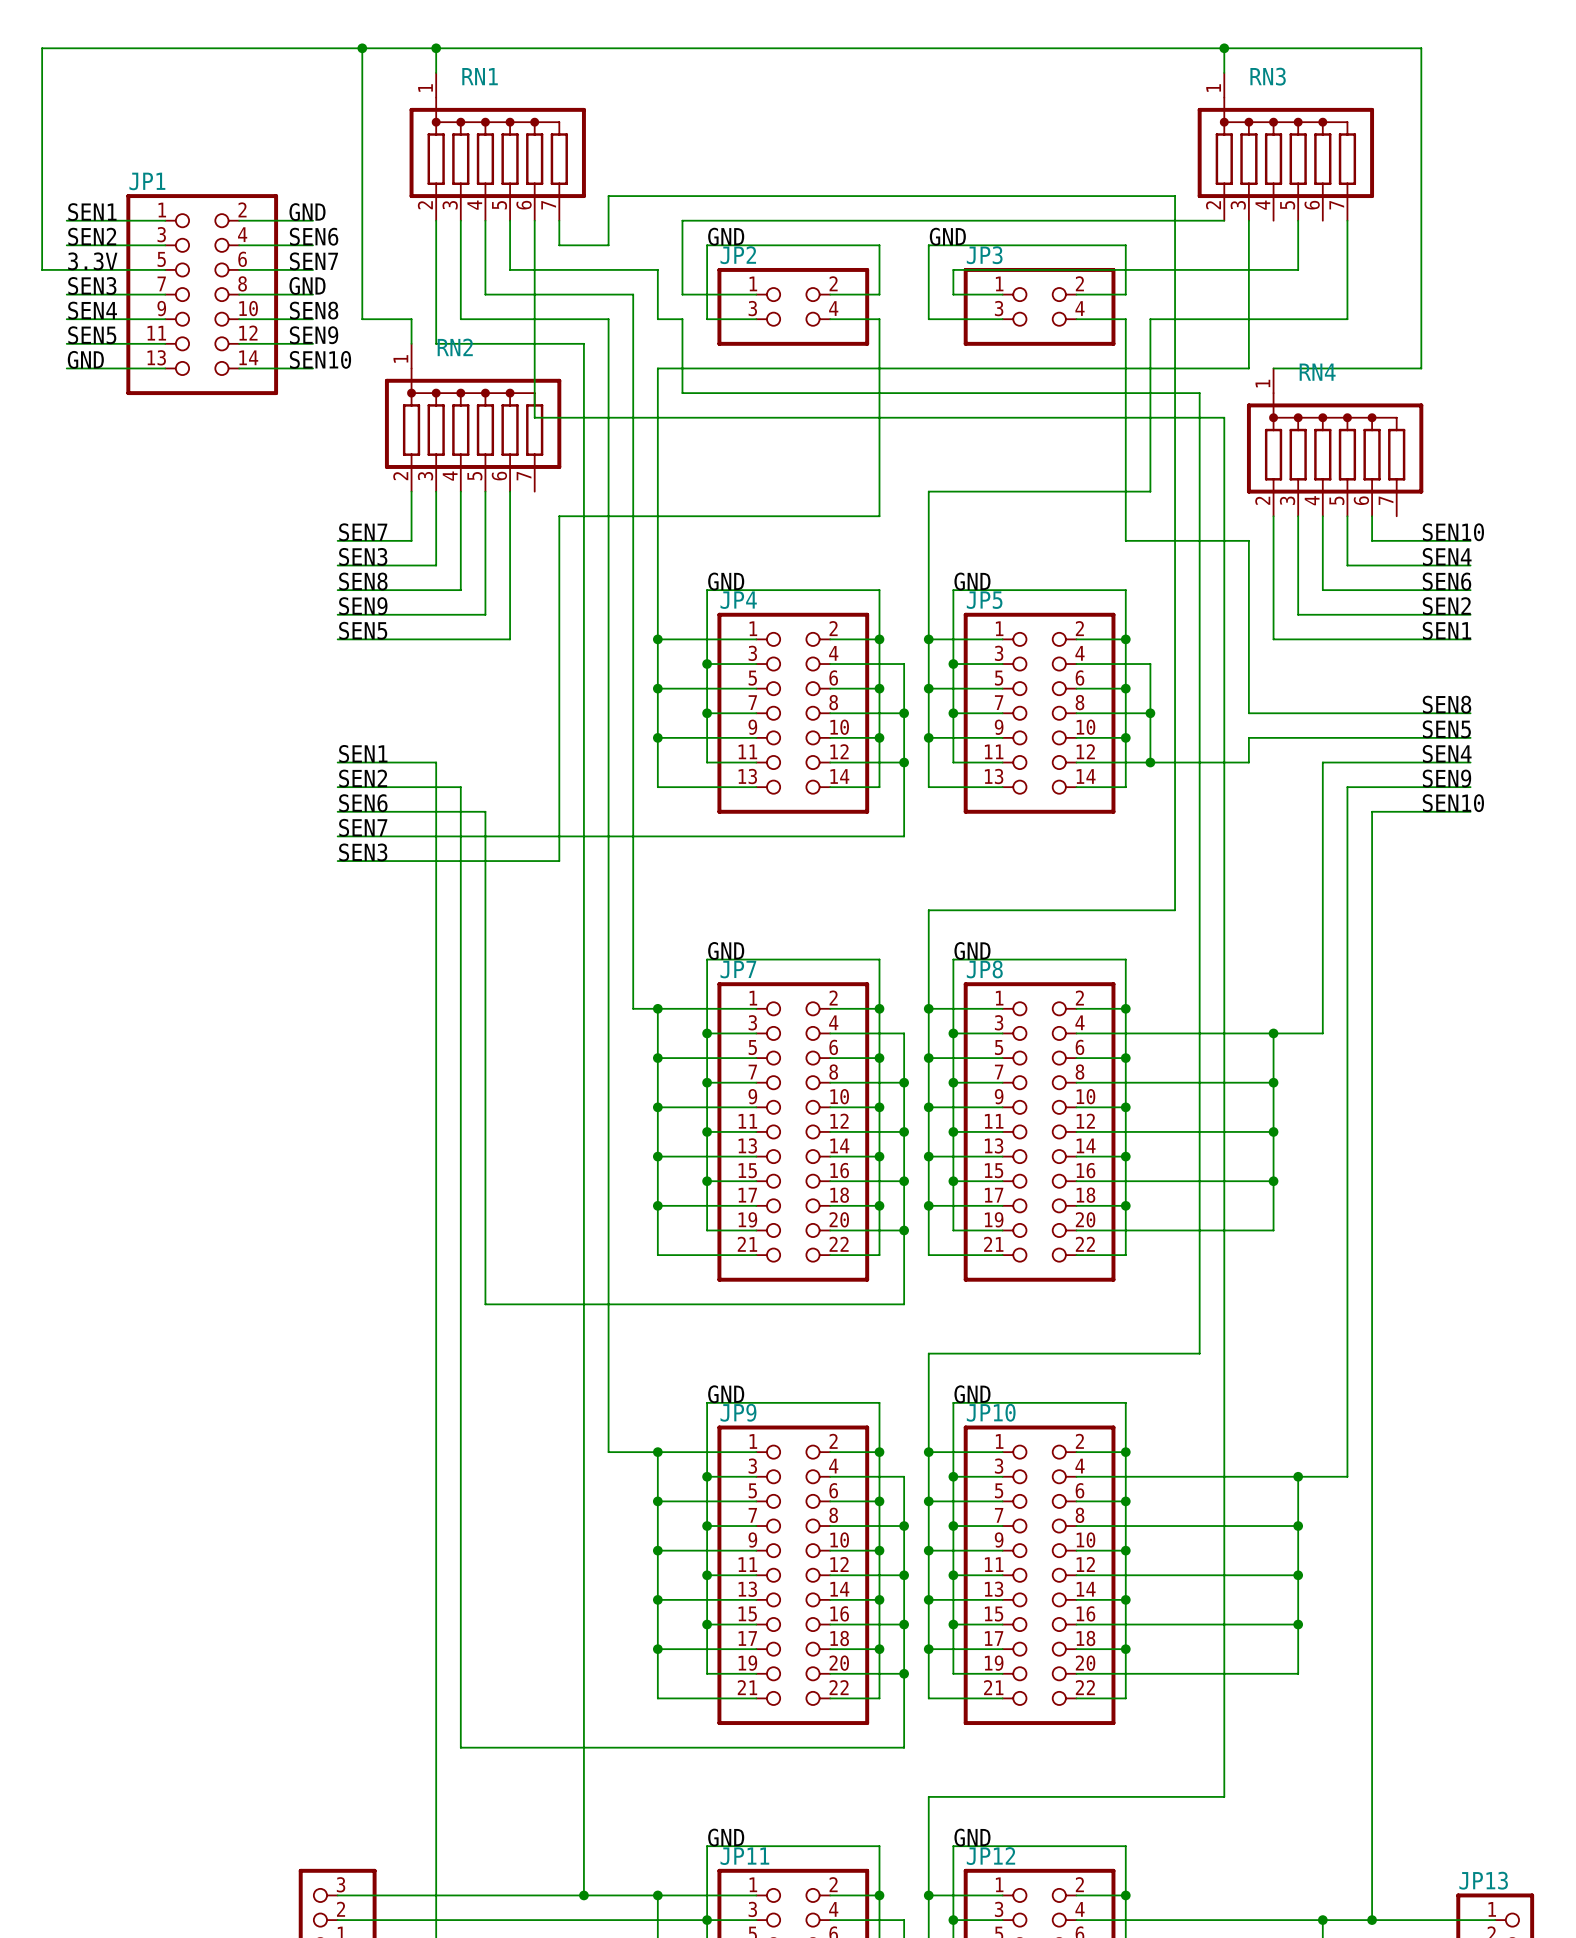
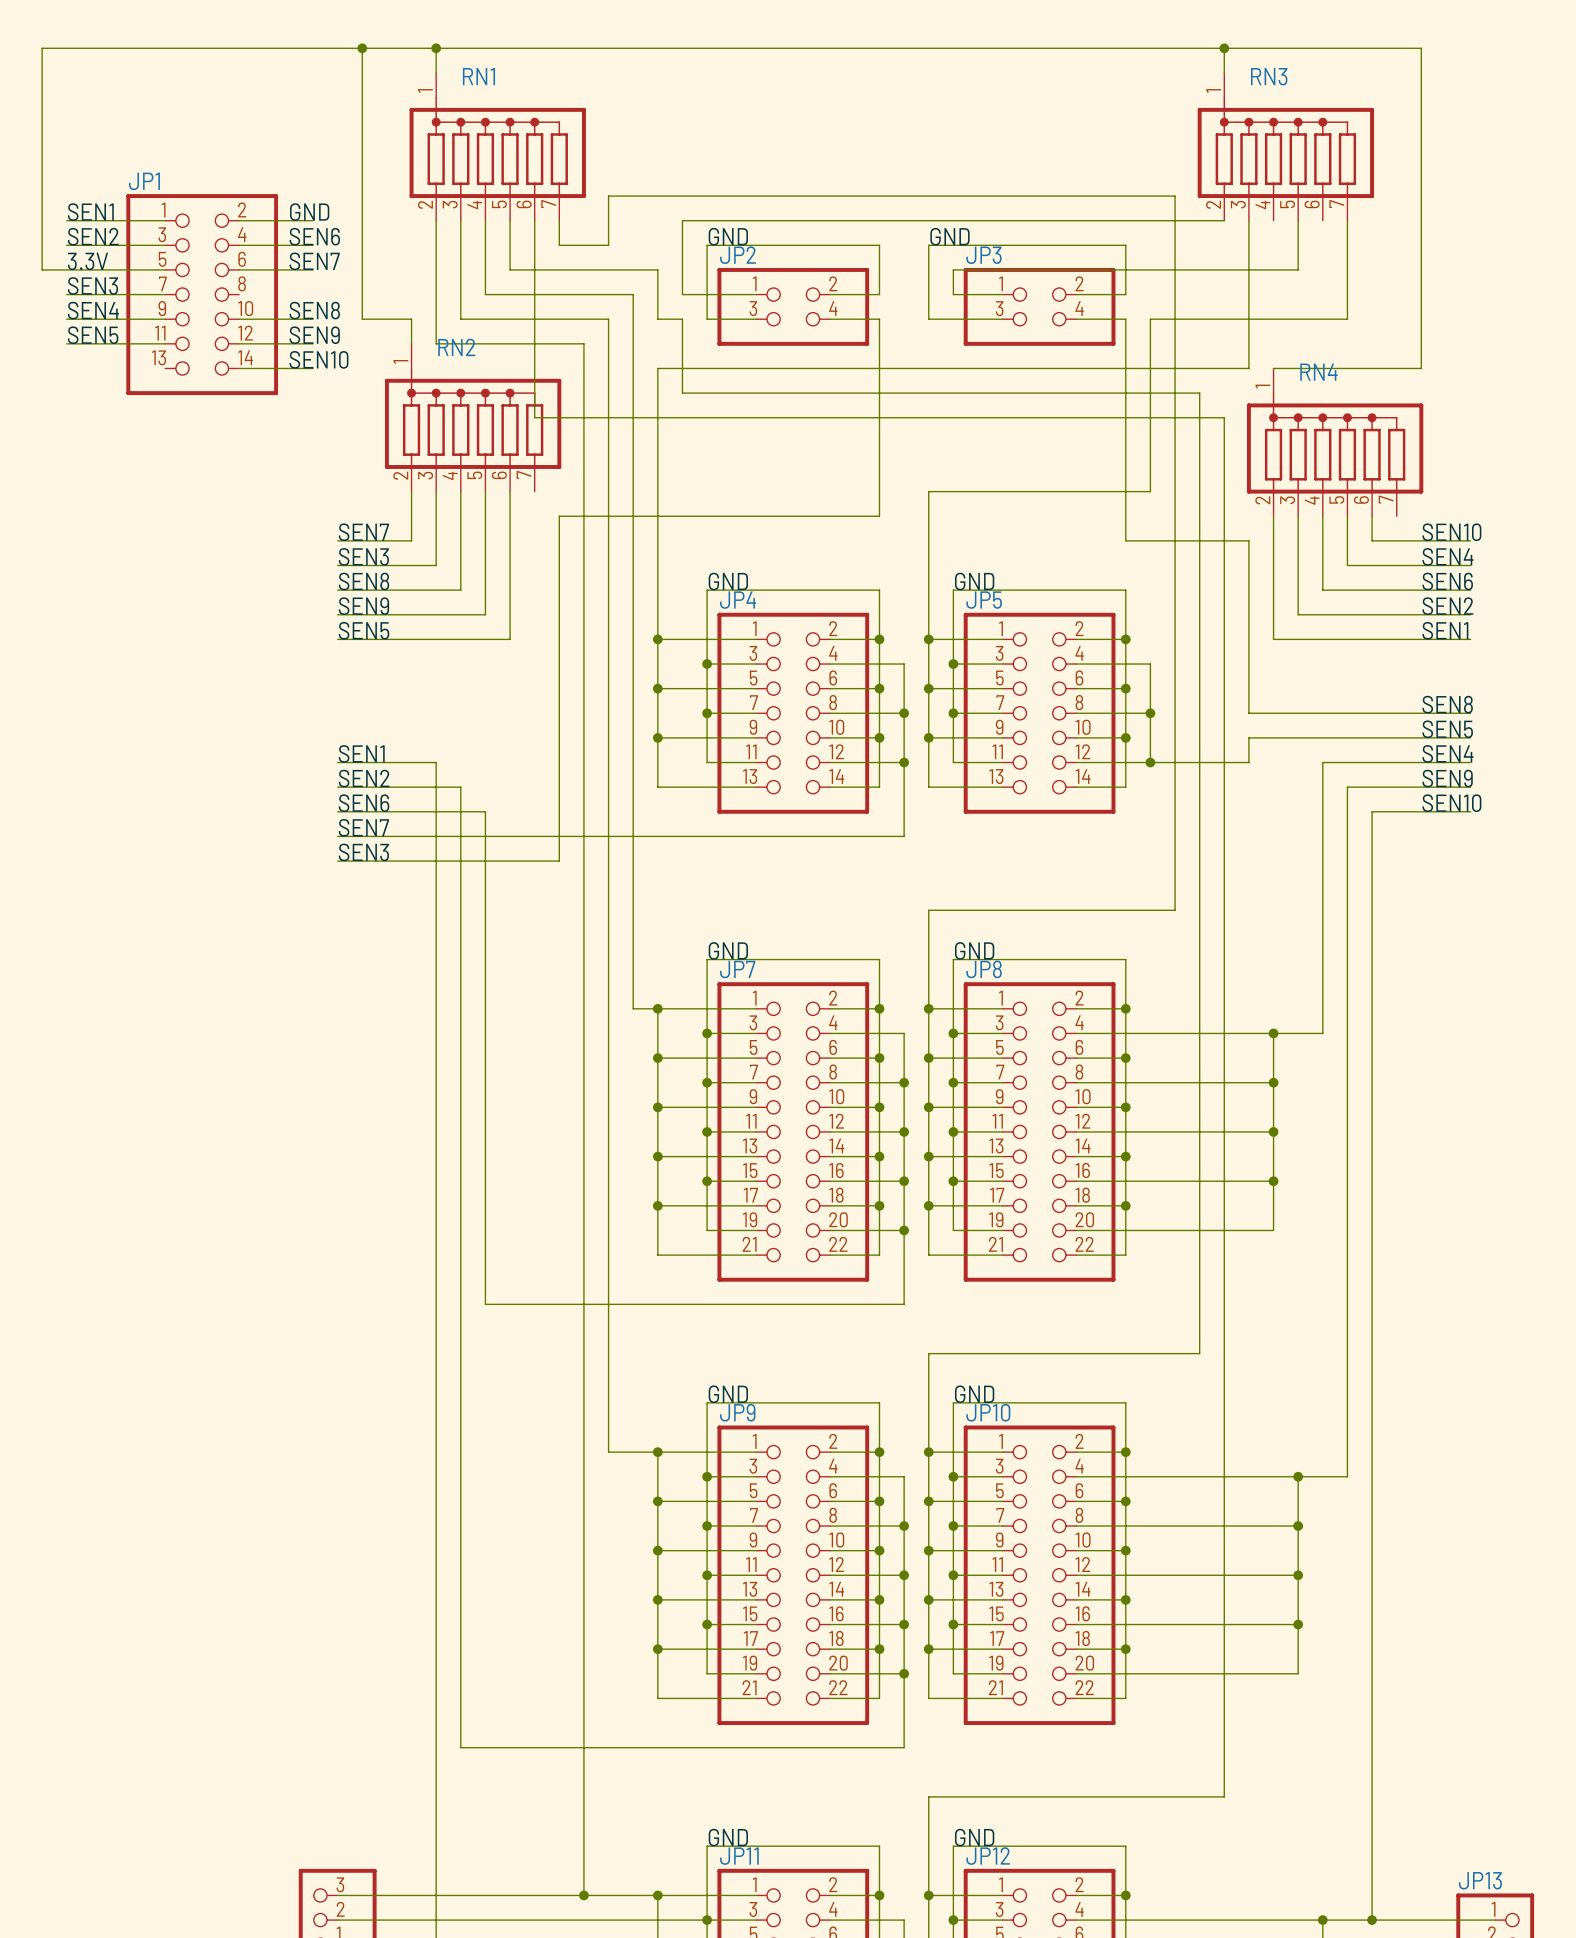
label: GND (307, 285) -> none
wire: (239, 294) (313, 294) -> none
label: GND (85, 359) -> none
wire: (66, 368) (165, 368) -> none

